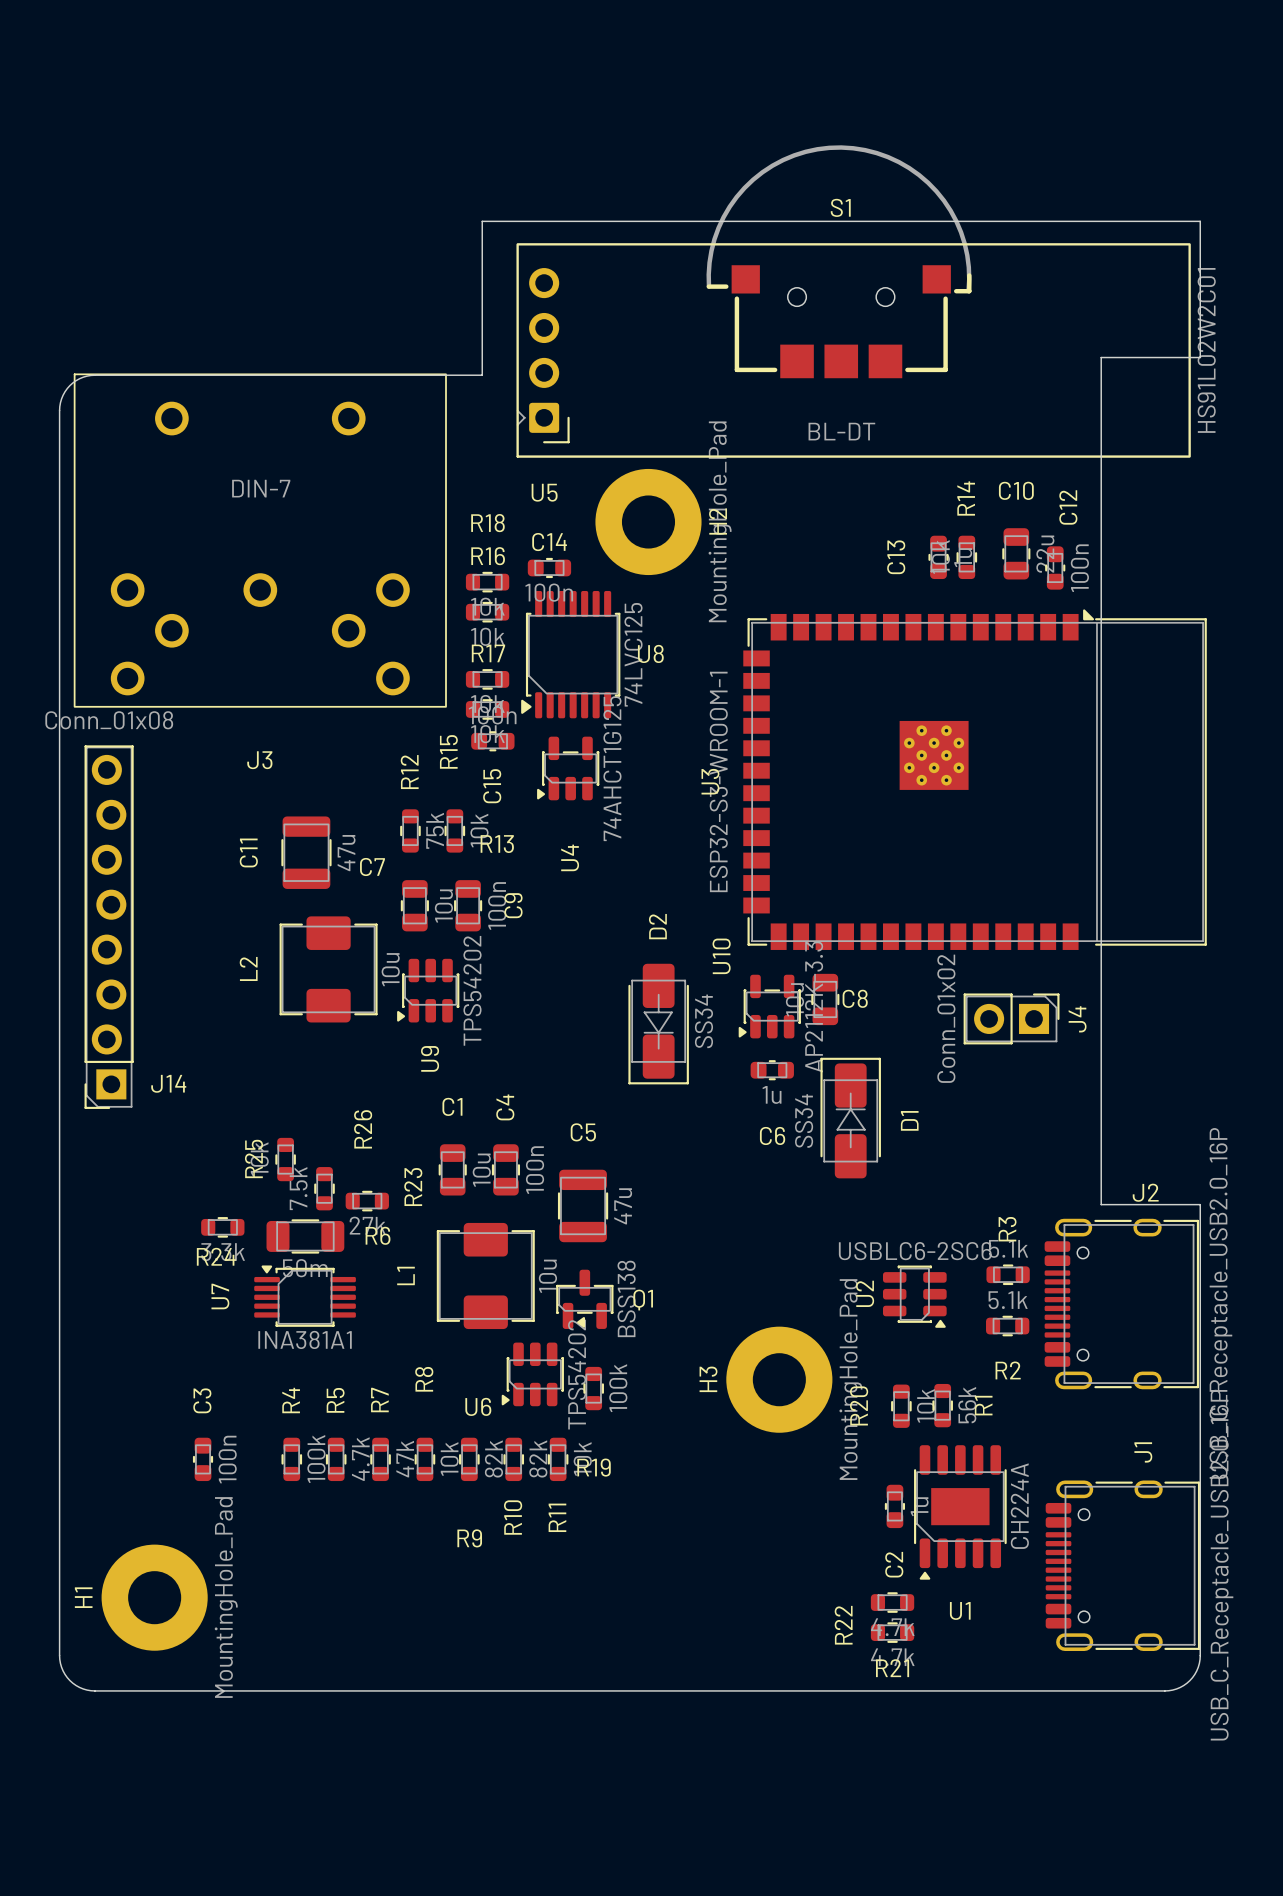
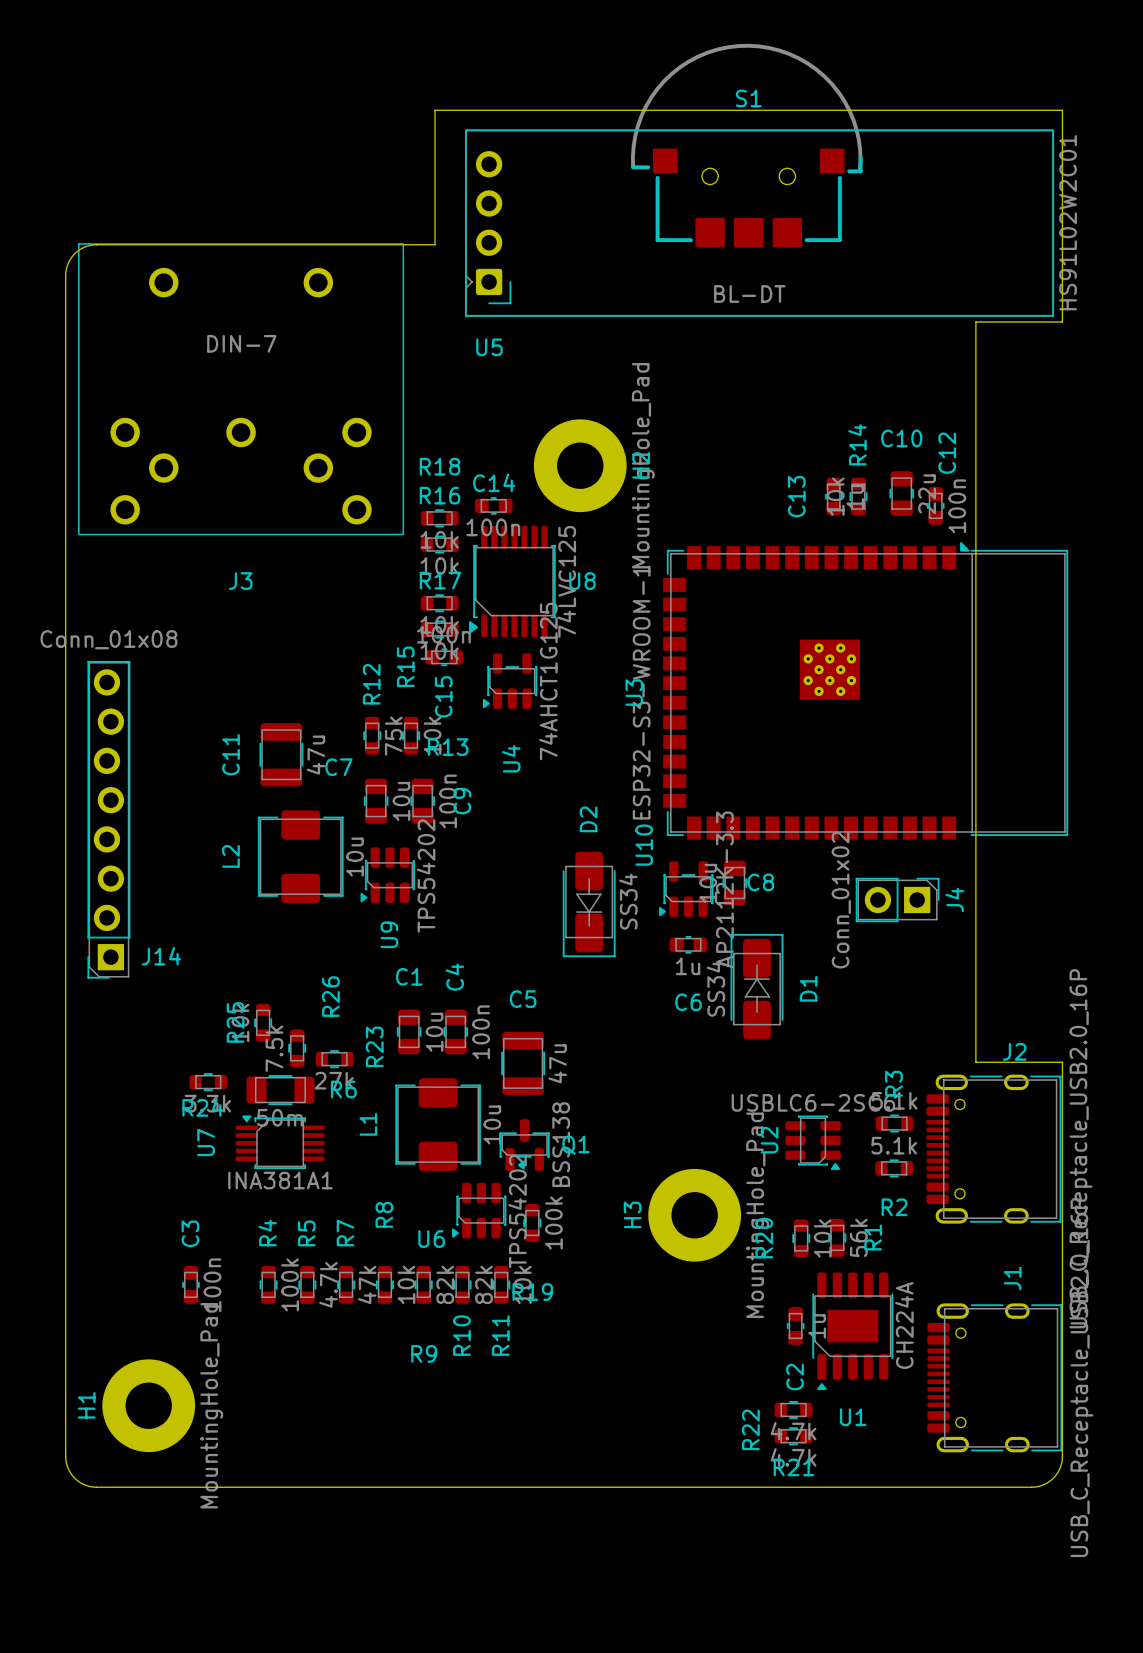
board edge: (482, 221) (1200, 221) -> (435, 203) (435, 110) (1062, 110) (1062, 203)
S1 position: (839, 261) -> (746, 145)
board edge: (482, 269) (482, 375) (90, 375) (79, 378) (67, 388) (61, 398) (59, 410) -> (435, 244) (96, 244) (86, 246) (72, 256) (66, 268) (65, 368)
U5 position: (853, 350) -> (759, 223)
J3 position: (260, 540) -> (241, 389)

